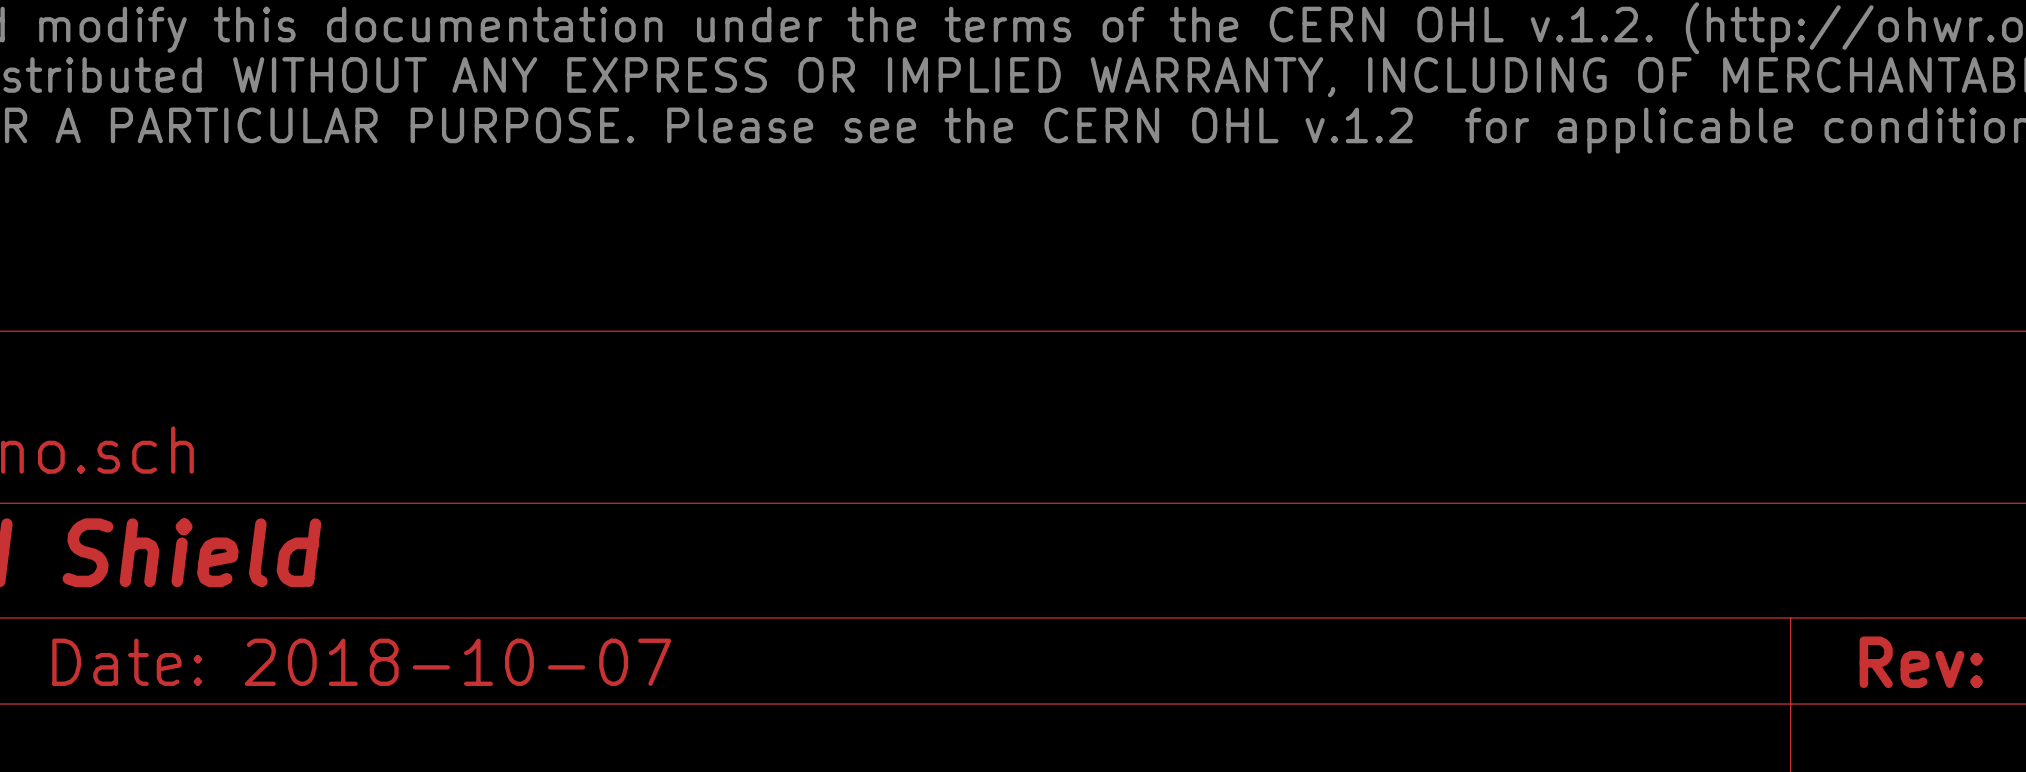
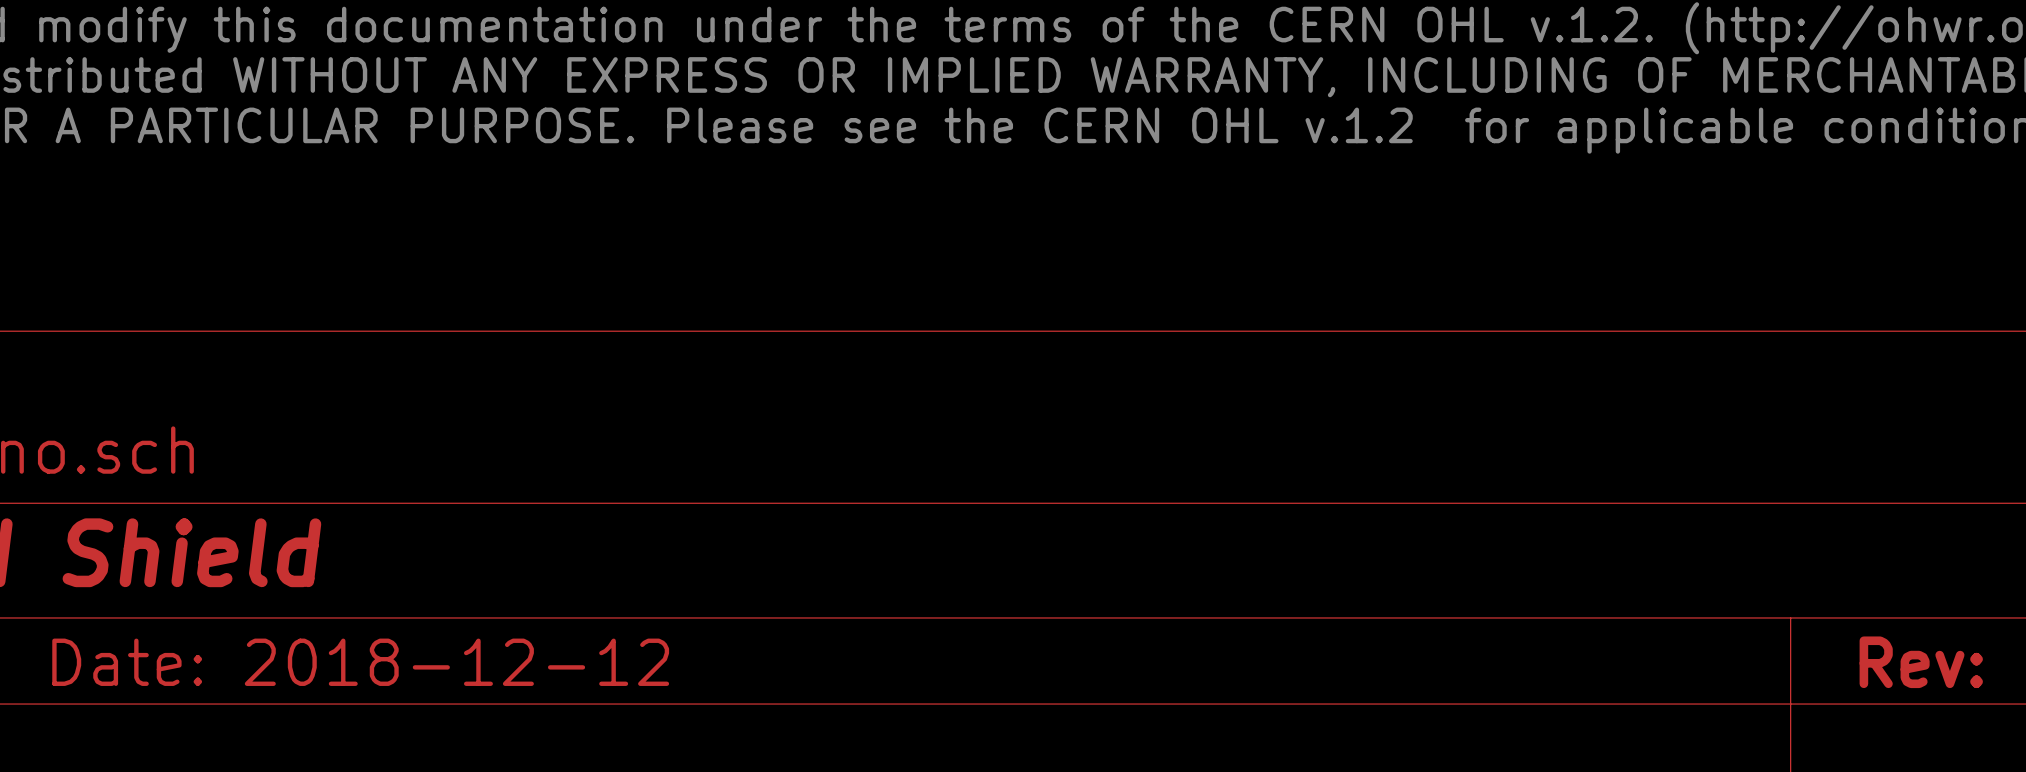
title block: Date: 2018-10-07 (361, 662) -> Date: 2018-12-12 (360, 662)

